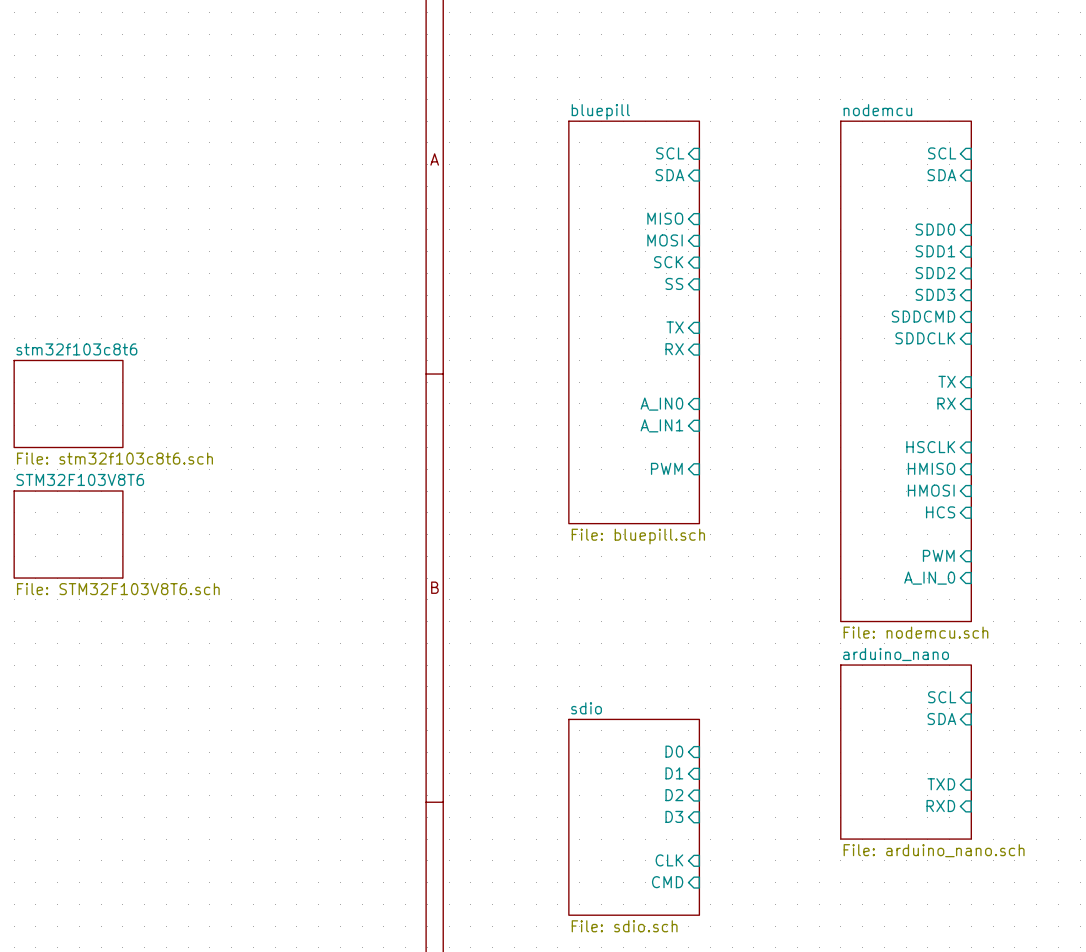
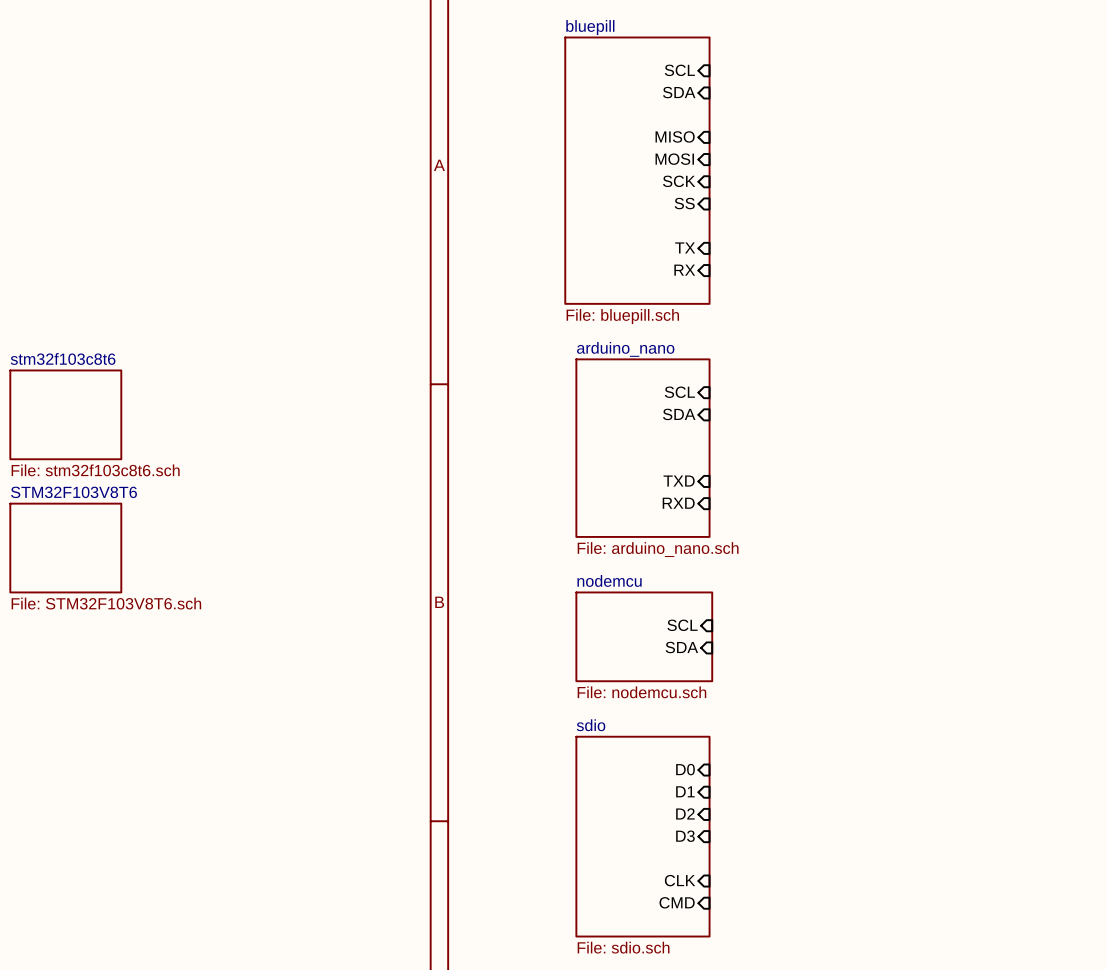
sheet pin: none -> SCL (679, 70)
sheet pin: none -> SDA (679, 92)
sheet pin: SCL (670, 153) -> MOSI (674, 159)
sheet pin: SCL (942, 153) -> none
sheet bluepill: none -> File: bluepill.sch (637, 170)
sheet pin: SDA (669, 175) -> SCK (679, 181)
sheet pin: SDA (941, 175) -> none
sheet pin position: MISO (665, 218) -> MISO (675, 136)
sheet pin: SDD0 (935, 229) -> none
sheet pin: MOSI (665, 240) -> TX (685, 247)
sheet pin: SDD1 (935, 251) -> none
sheet pin: SCK (668, 262) -> RX (684, 270)
sheet pin: SDD2 (935, 273) -> none
sheet pin position: SS (674, 283) -> SS (684, 203)
sheet pin: SDD3 (935, 294) -> none
sheet pin: SDDCMD (923, 316) -> none
sheet bluepill: File: bluepill.sch (634, 322) -> none
sheet pin: TX (675, 327) -> none
sheet pin: SDDCLK (925, 338) -> none
sheet pin: RX (674, 349) -> none
sheet nodemcu: File: nodemcu.sch (906, 371) -> none
sheet pin: none -> SCL (679, 392)
sheet pin: TX (947, 381) -> none
sheet pin: RX (946, 403) -> none
sheet pin: A_IN0 (661, 404) -> SDA (679, 414)
sheet pin: A_IN1 (661, 425) -> none
sheet arduino_nano: none -> File: arduino_nano.sch (642, 448)
sheet pin: HSCLK (930, 447) -> none
sheet pin: PWM (666, 468) -> TXD (679, 481)
sheet pin: HMISO (931, 468) -> none
sheet pin: none -> RXD (678, 503)
sheet pin: HMOSI (931, 490) -> none
sheet pin: HCS (940, 512) -> none
sheet pin: PWM (938, 555) -> none
sheet pin: A_IN_0 (929, 578) -> none
sheet pin: none -> SCL (682, 625)
sheet nodemcu: none -> File: nodemcu.sch (644, 636)
sheet pin: none -> SDA (681, 647)
sheet pin: SCL (942, 697) -> none
sheet pin: SDA (941, 719) -> none
sheet arduino_nano: File: arduino_nano.sch (906, 752) -> none
sheet pin: TXD (941, 784) -> none
sheet pin: RXD (940, 806) -> none

